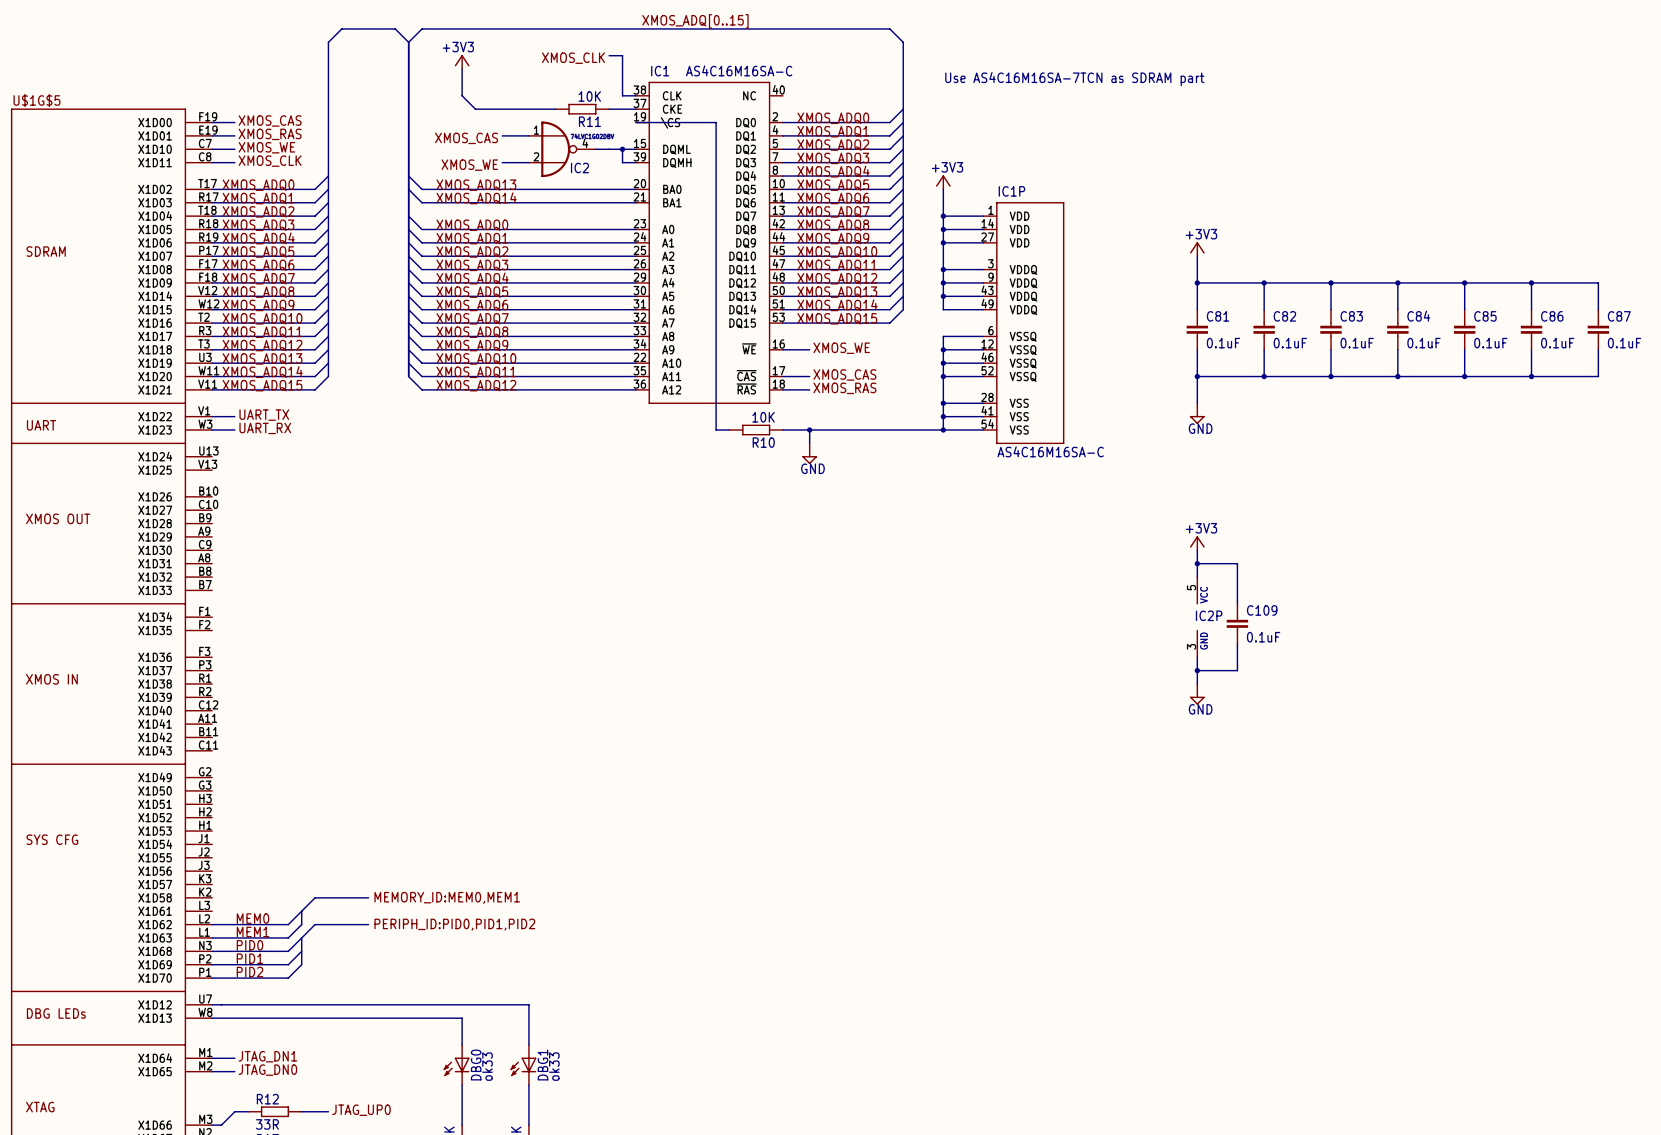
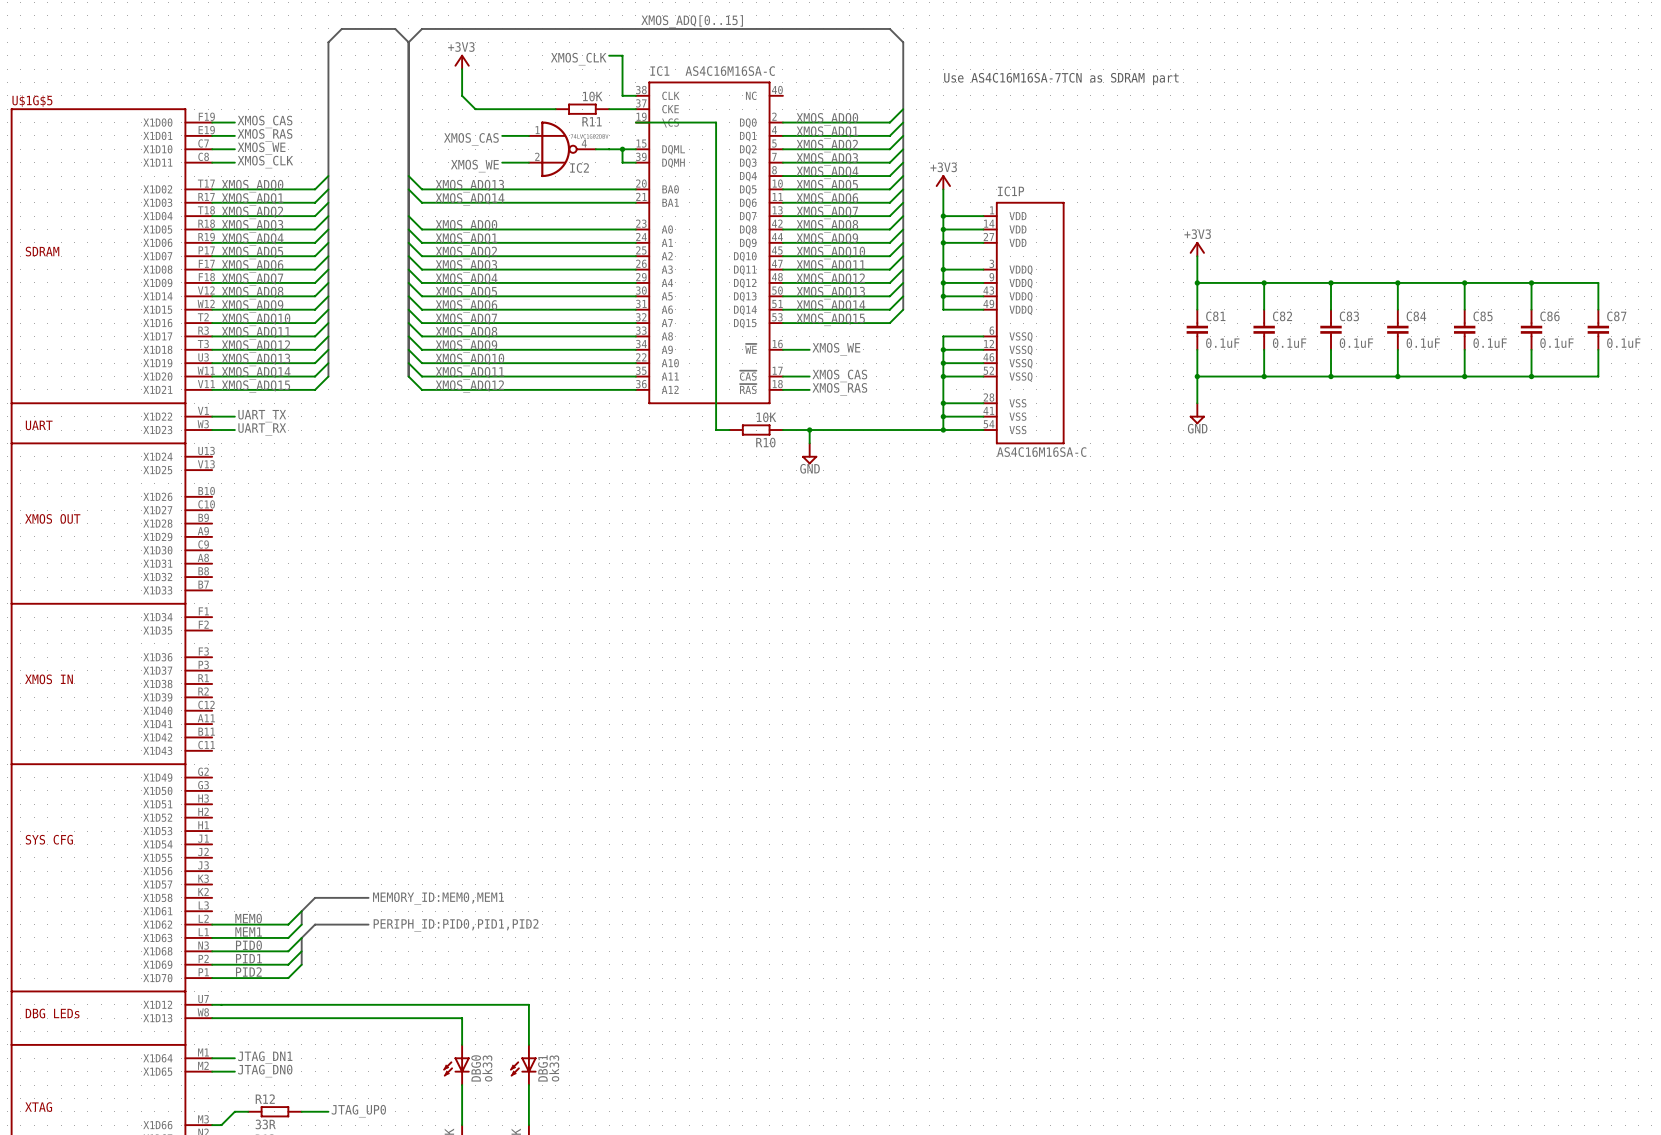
power symbol: +3V3 (1197, 543) -> none
wire: (1197, 550) (1197, 577) -> none
wire: (1197, 563) (1237, 563) (1237, 603) -> none
junction: (1197, 563) -> none
IC2P: (1197, 617) -> none
C109: 0.1uF (1237, 623) -> none
wire: (1237, 643) (1237, 670) (1197, 670) -> none
wire: (1197, 657) (1197, 683) -> none
junction: (1197, 670) -> none
power symbol: GND (1197, 694) -> none

